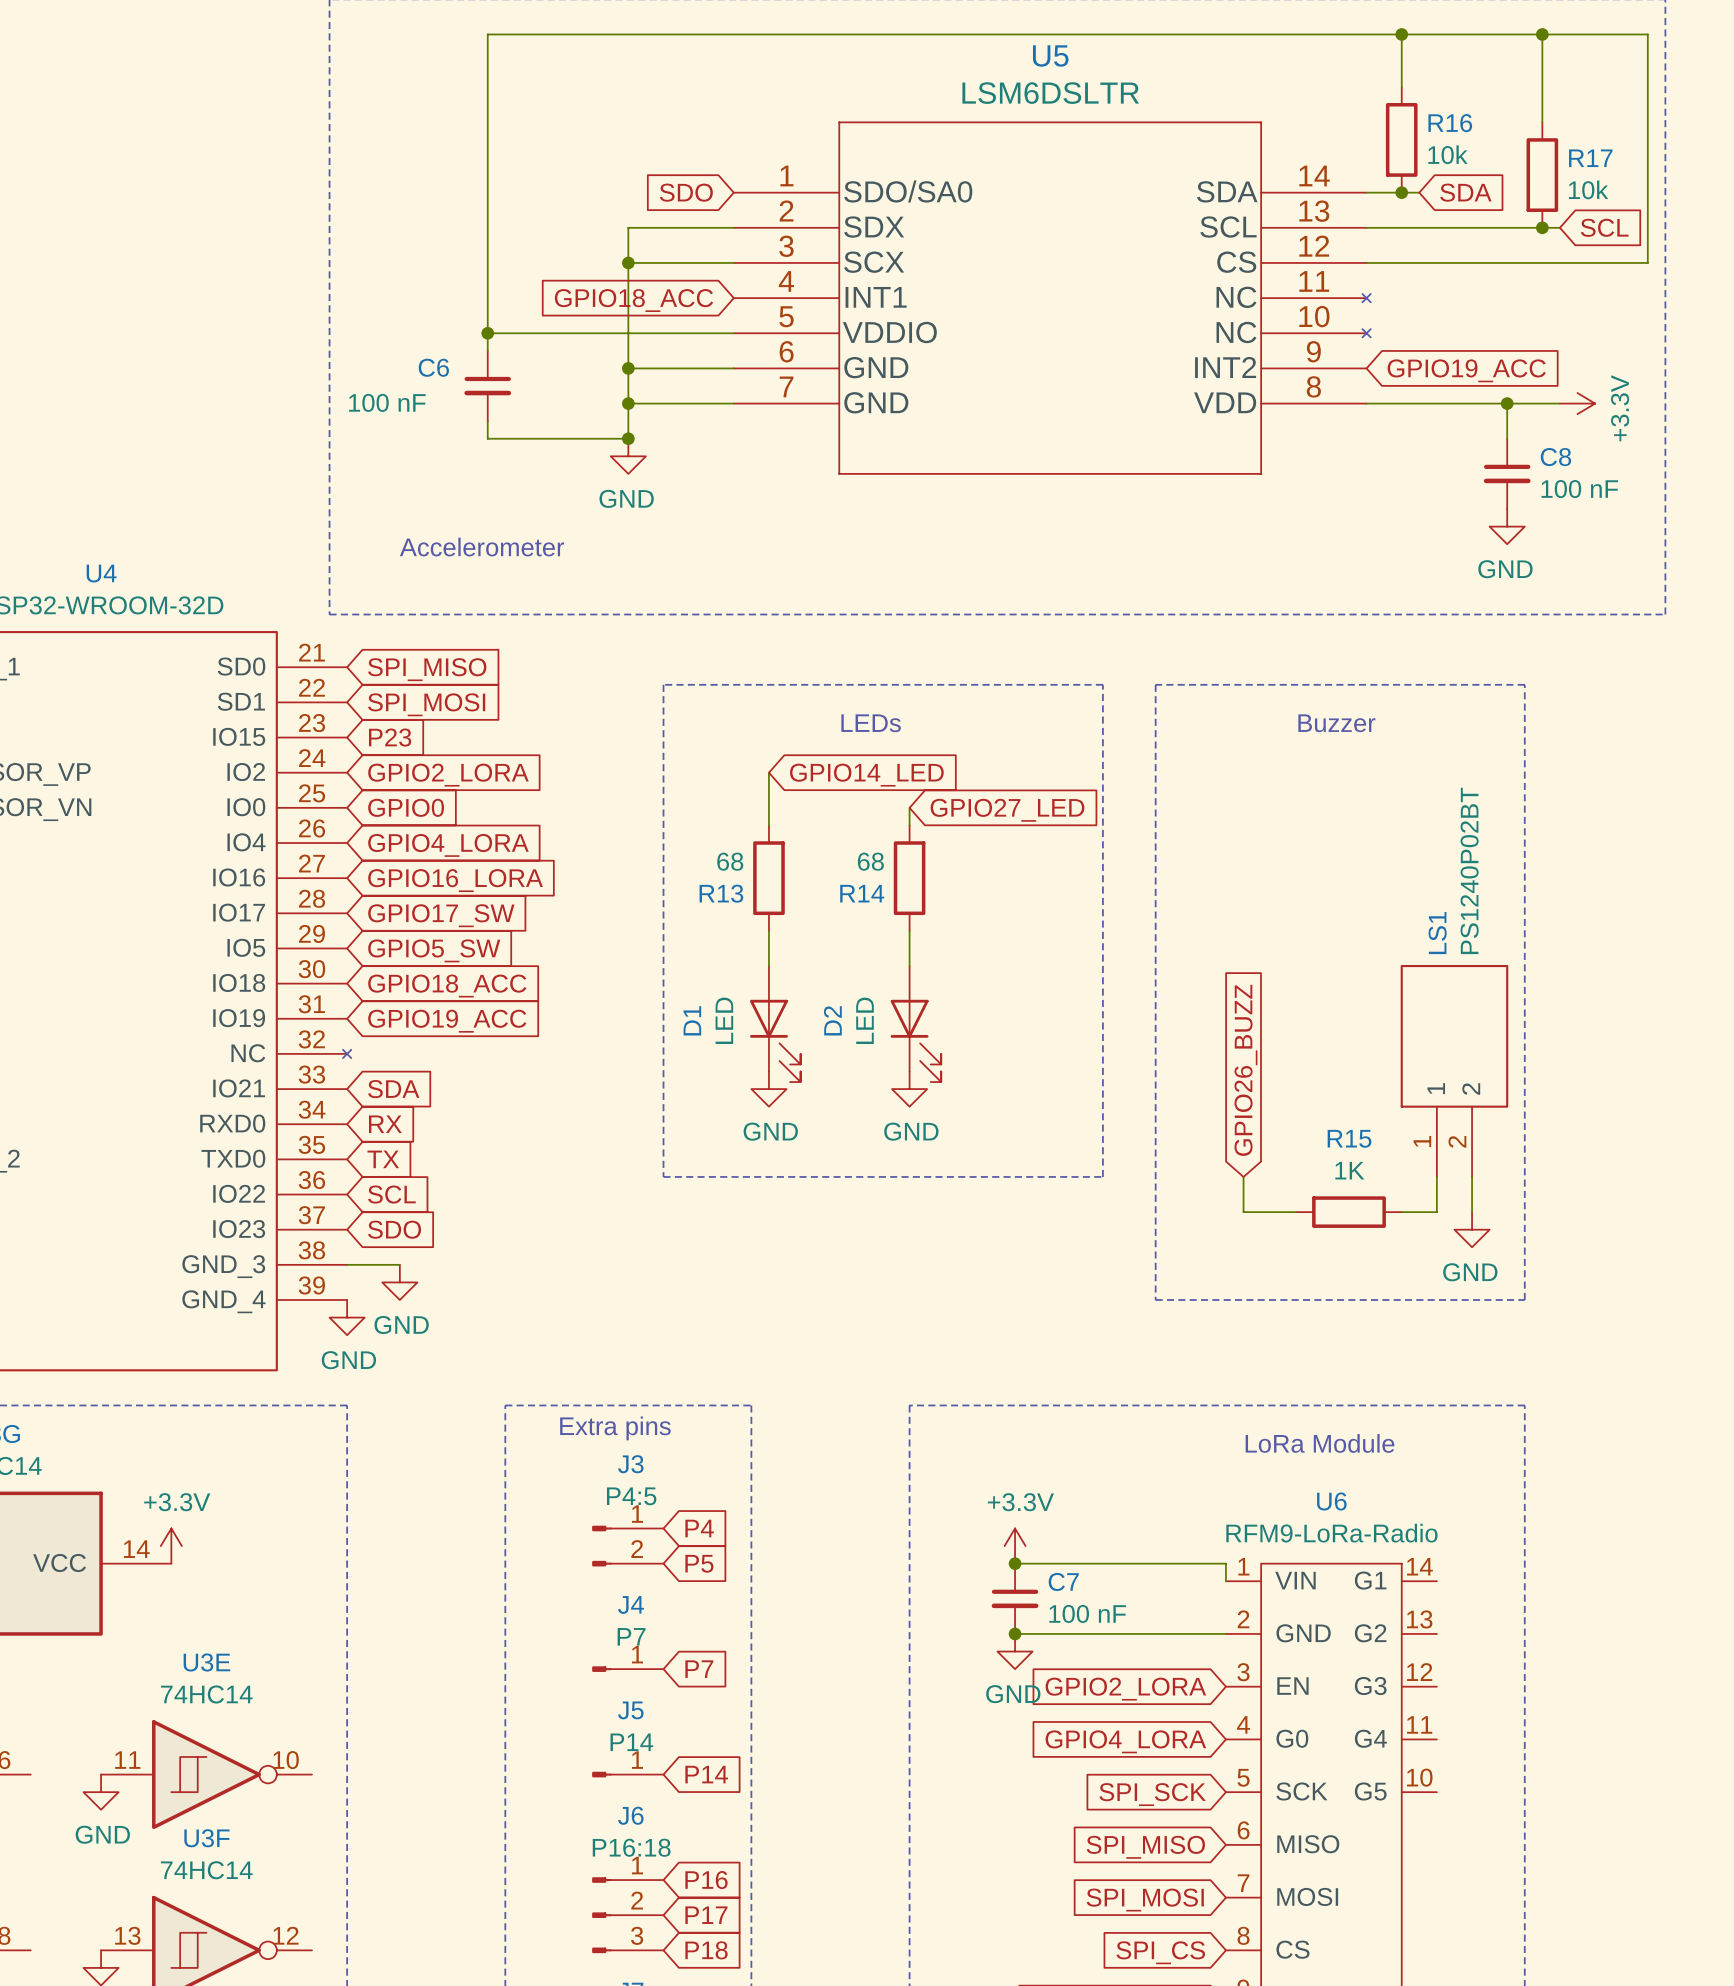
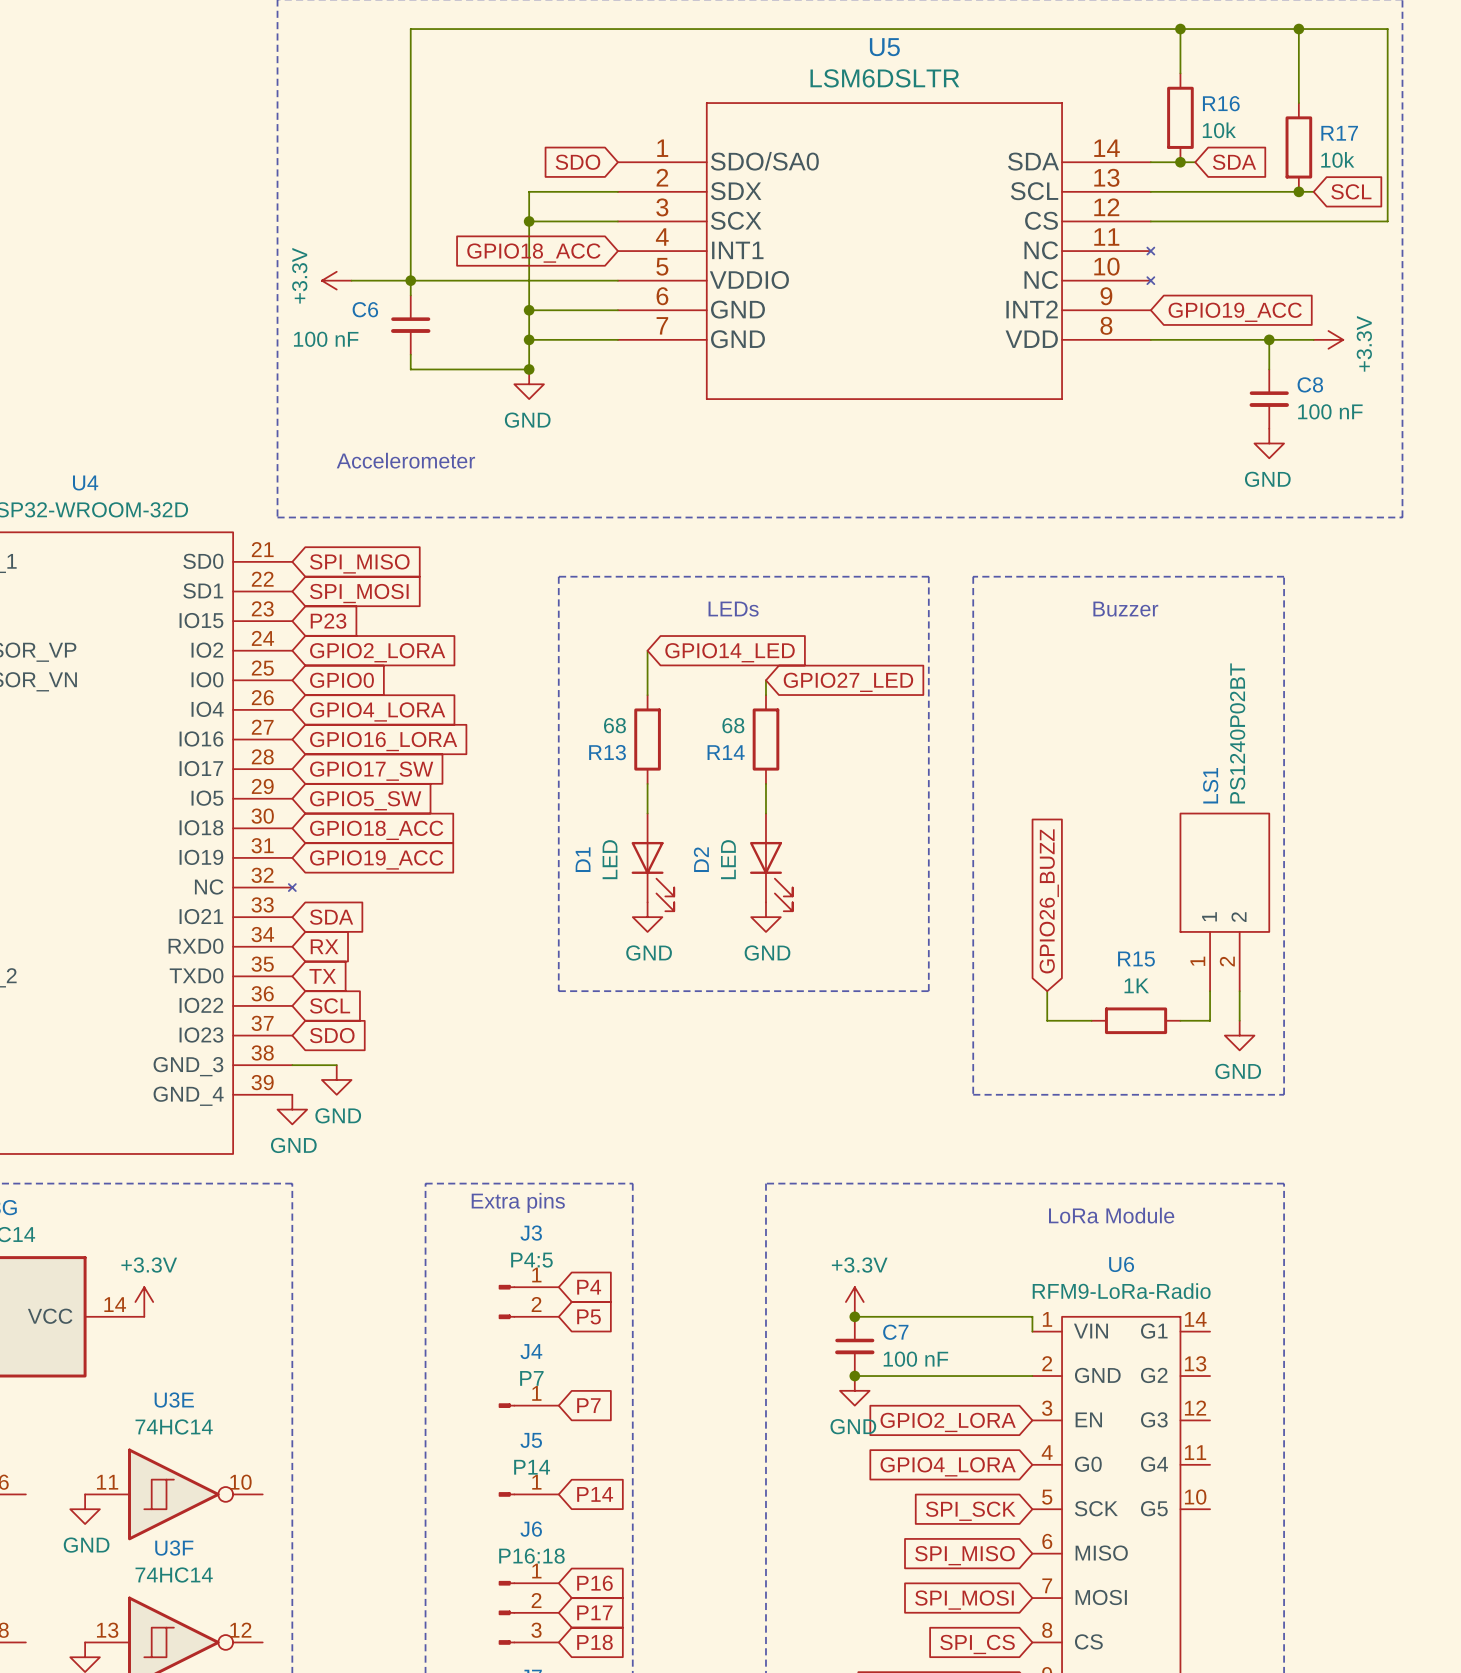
power symbol: none -> +3.3V (336, 280)
wire: none -> (351, 280) (410, 280)

